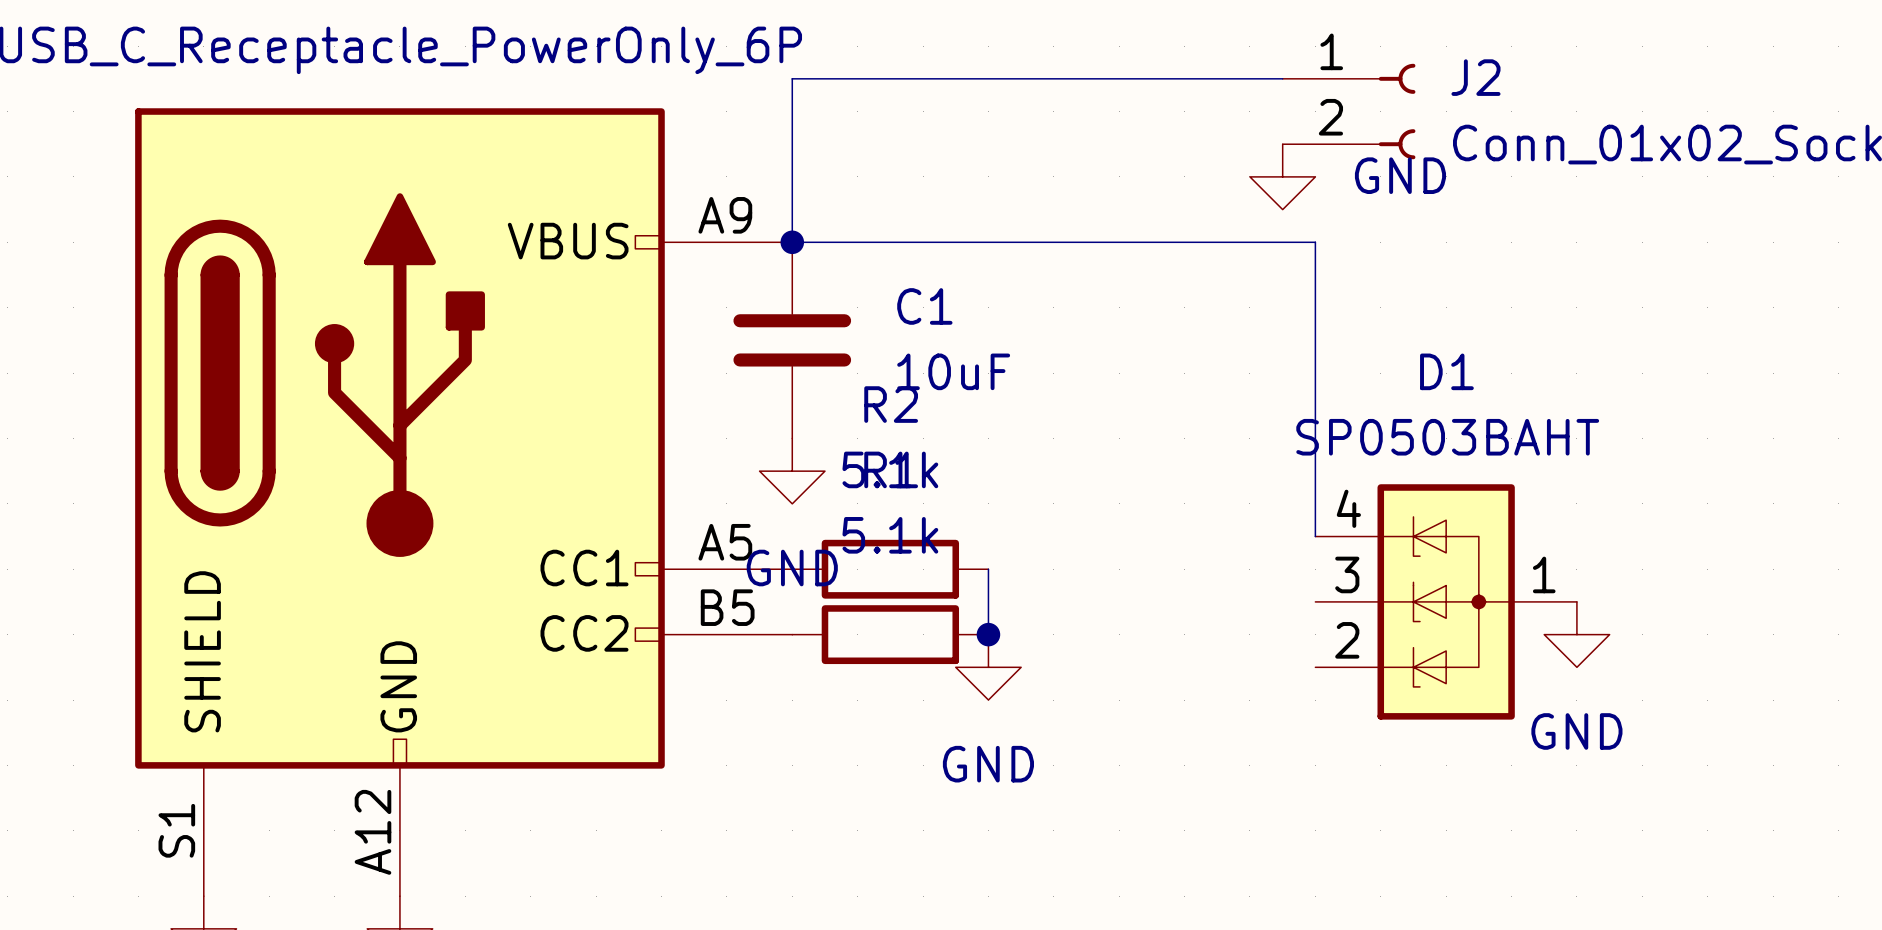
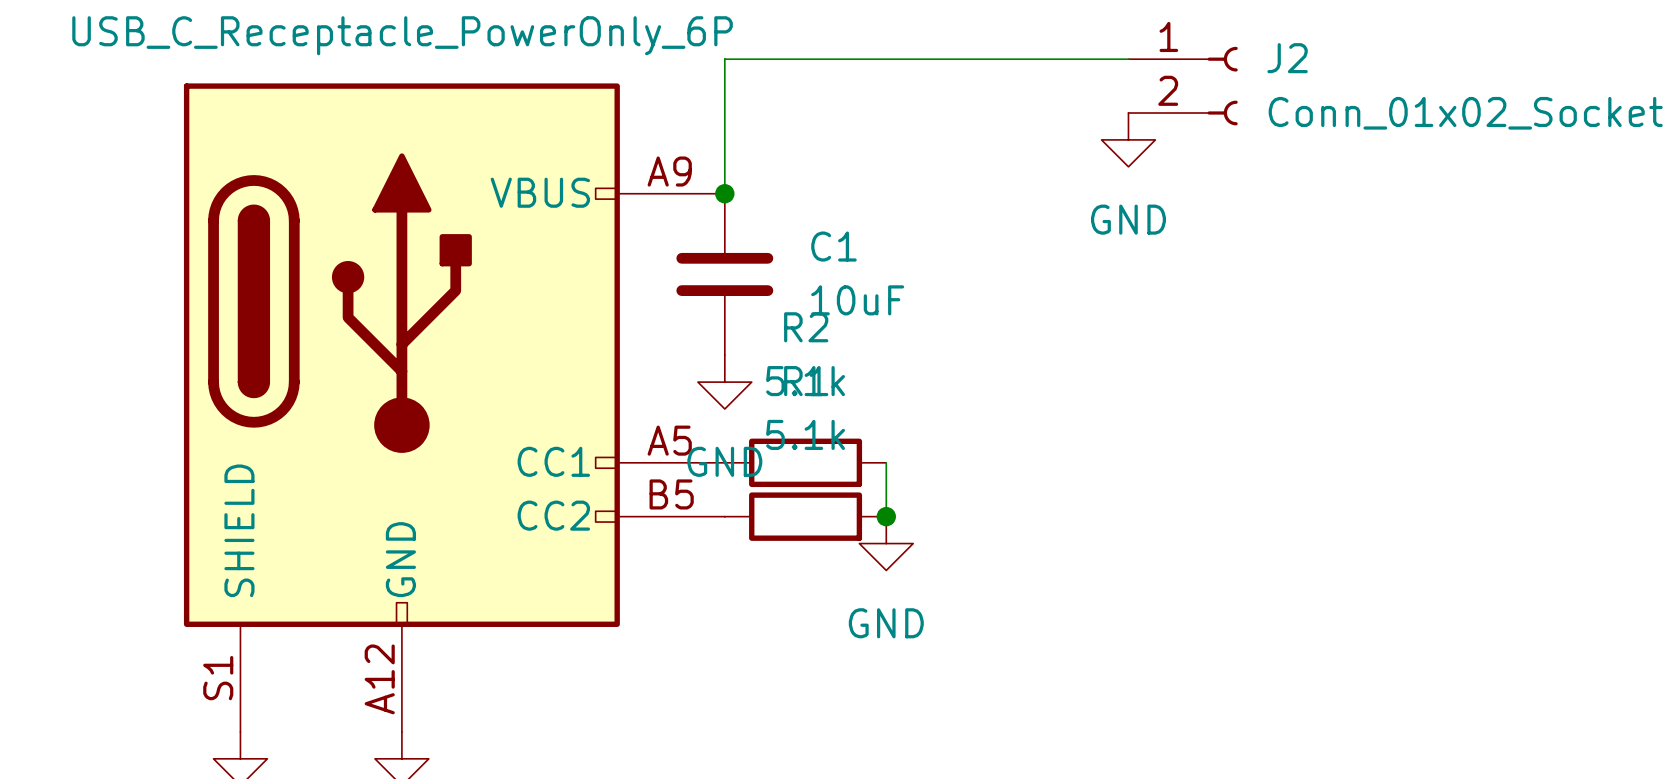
power symbol text position: GND (1400, 175) -> GND (1128, 219)
wire: (792, 242) (1315, 242) (1315, 536) -> none
D1: SP0503BAHT (1446, 601) -> none
power symbol: GND (1576, 634) -> none

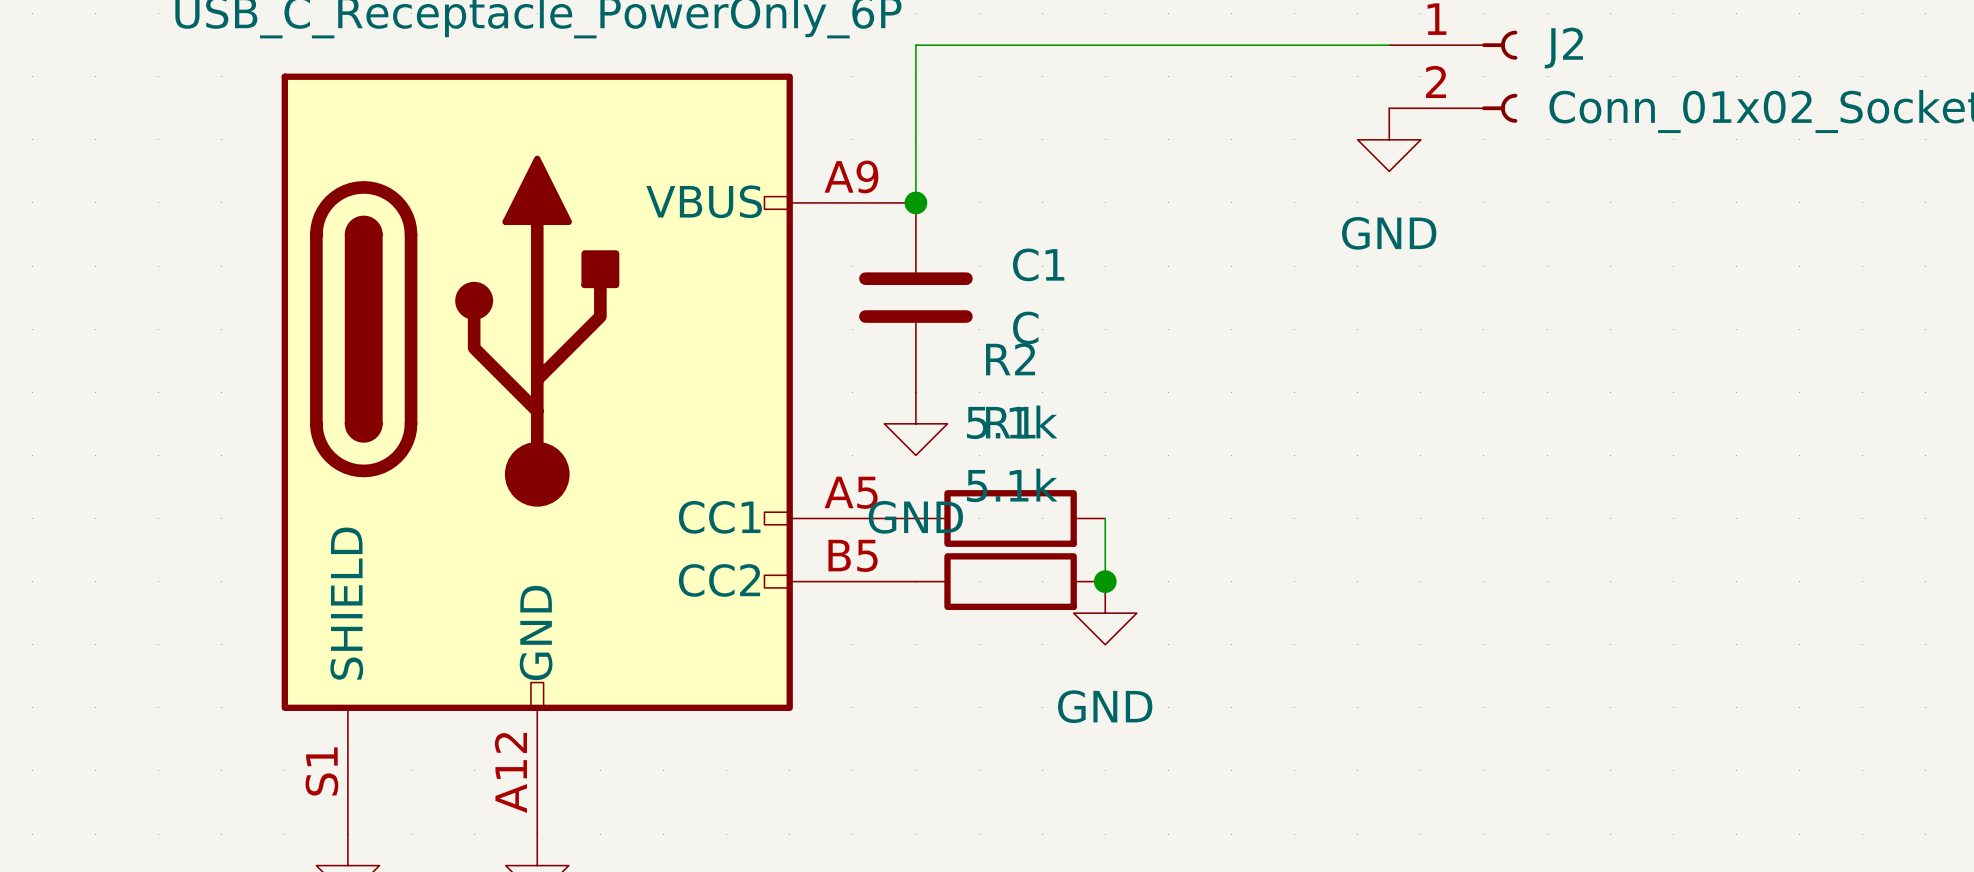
C1 value: 10uF (857, 300) -> C (1025, 328)

